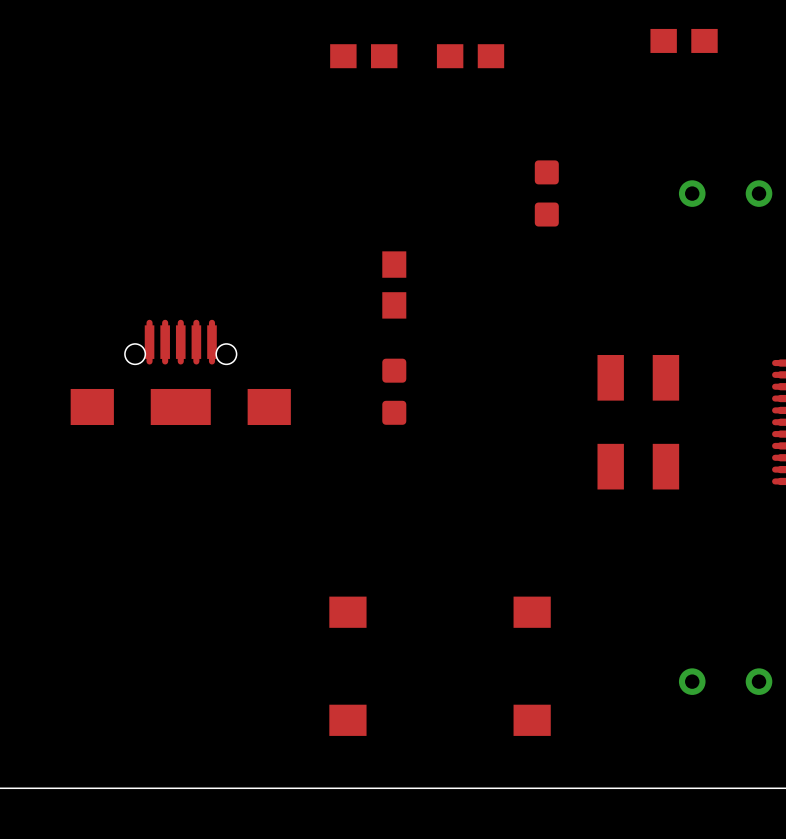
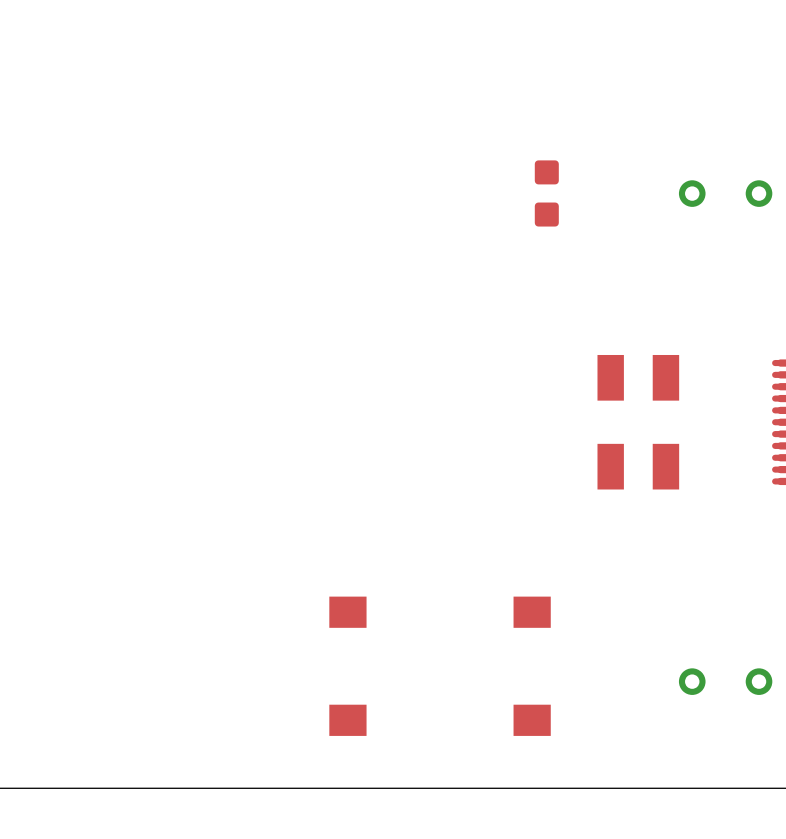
part: (684, 40) -> none
part: (363, 56) -> none
part: (470, 56) -> none
part: (394, 284) -> none
part: (180, 372) -> none
part: (394, 391) -> none

